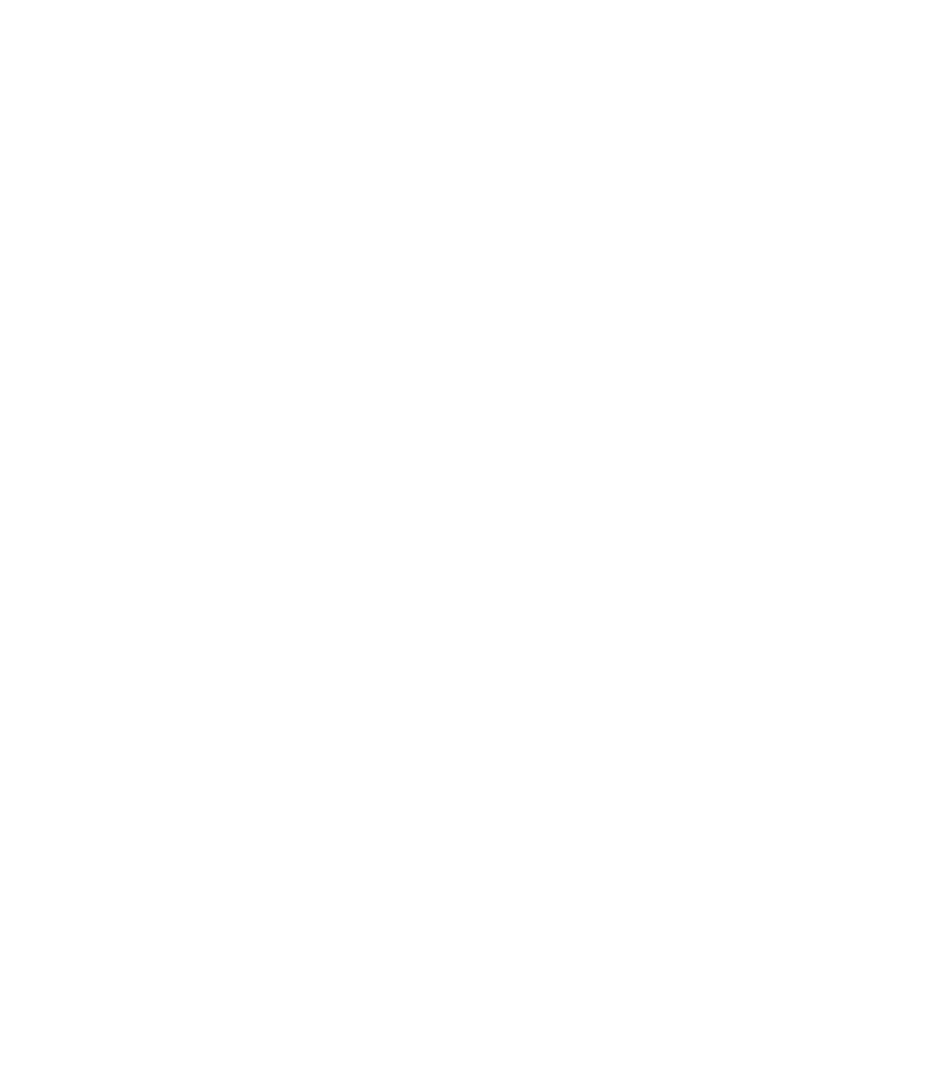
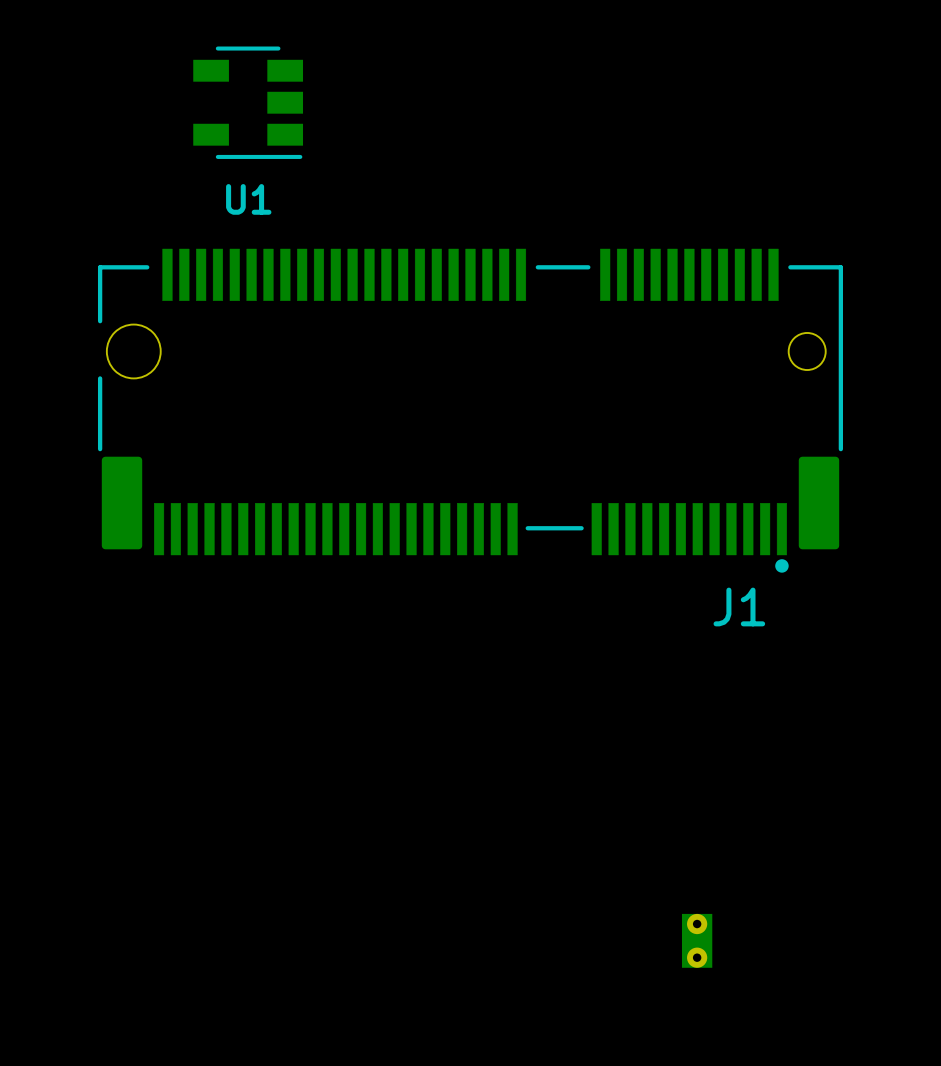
U1: none -> (248, 102)
J1: none -> (470, 410)
part: none -> (697, 940)

